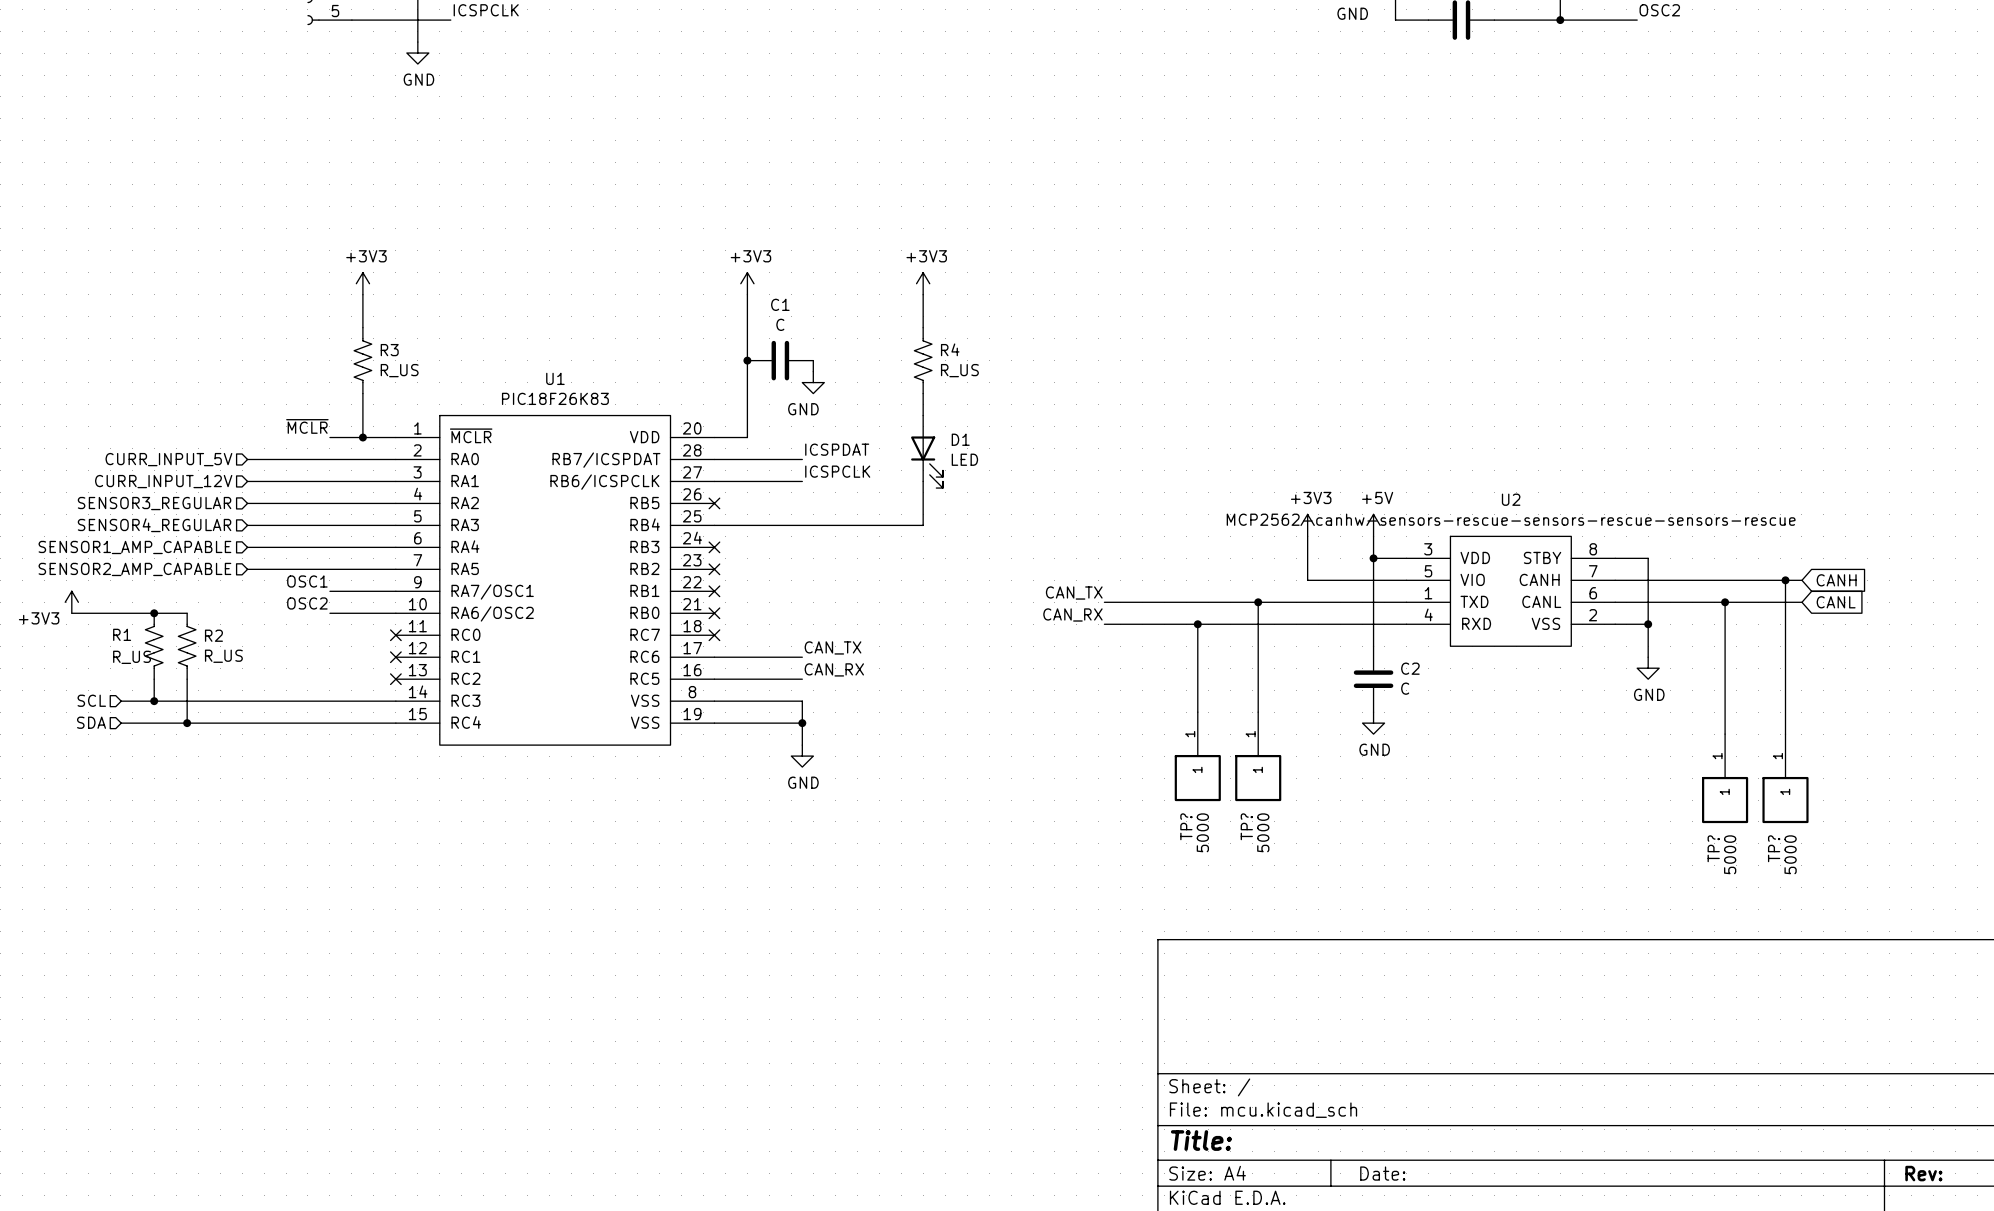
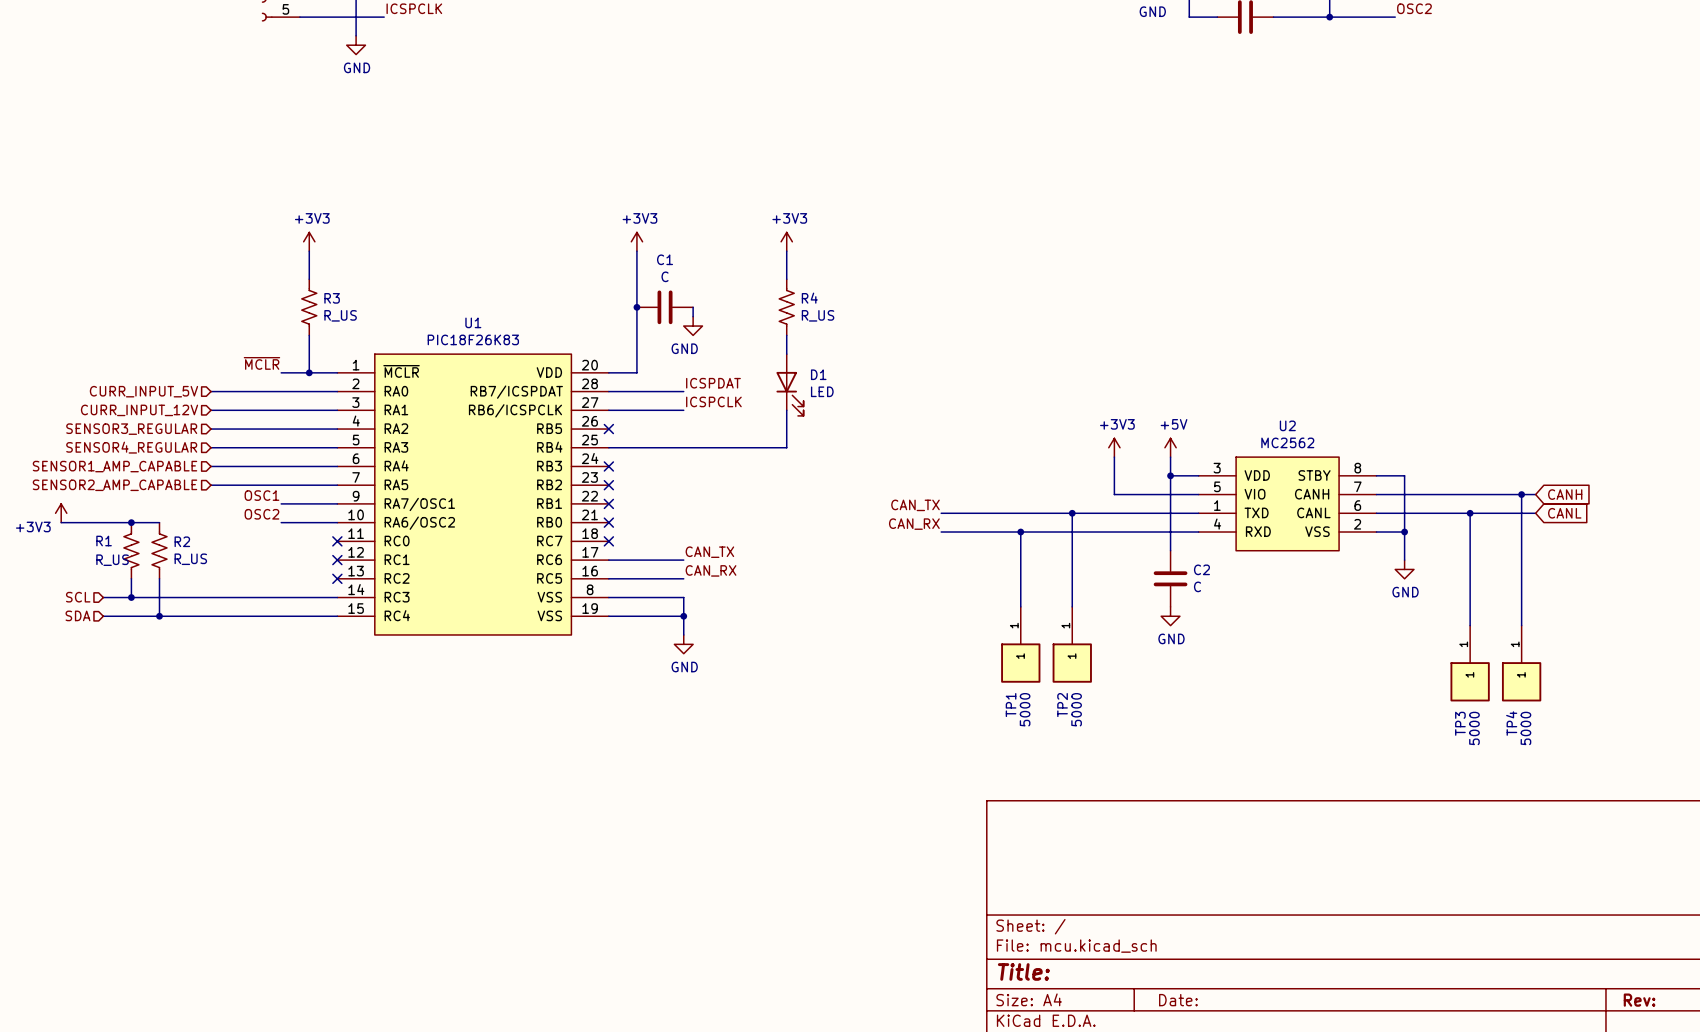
U2 value: MCP2562-canhw-sensors-rescue-sensors-rescue-sensors-rescue (1511, 519) -> MC2562 (1287, 442)
TP? name: TP? (1186, 826) -> TP1 (1011, 705)
TP? name: TP? (1246, 826) -> TP2 (1062, 705)
TP? name: TP? (1713, 848) -> TP3 (1460, 723)
TP? name: TP? (1774, 848) -> TP4 (1511, 723)

